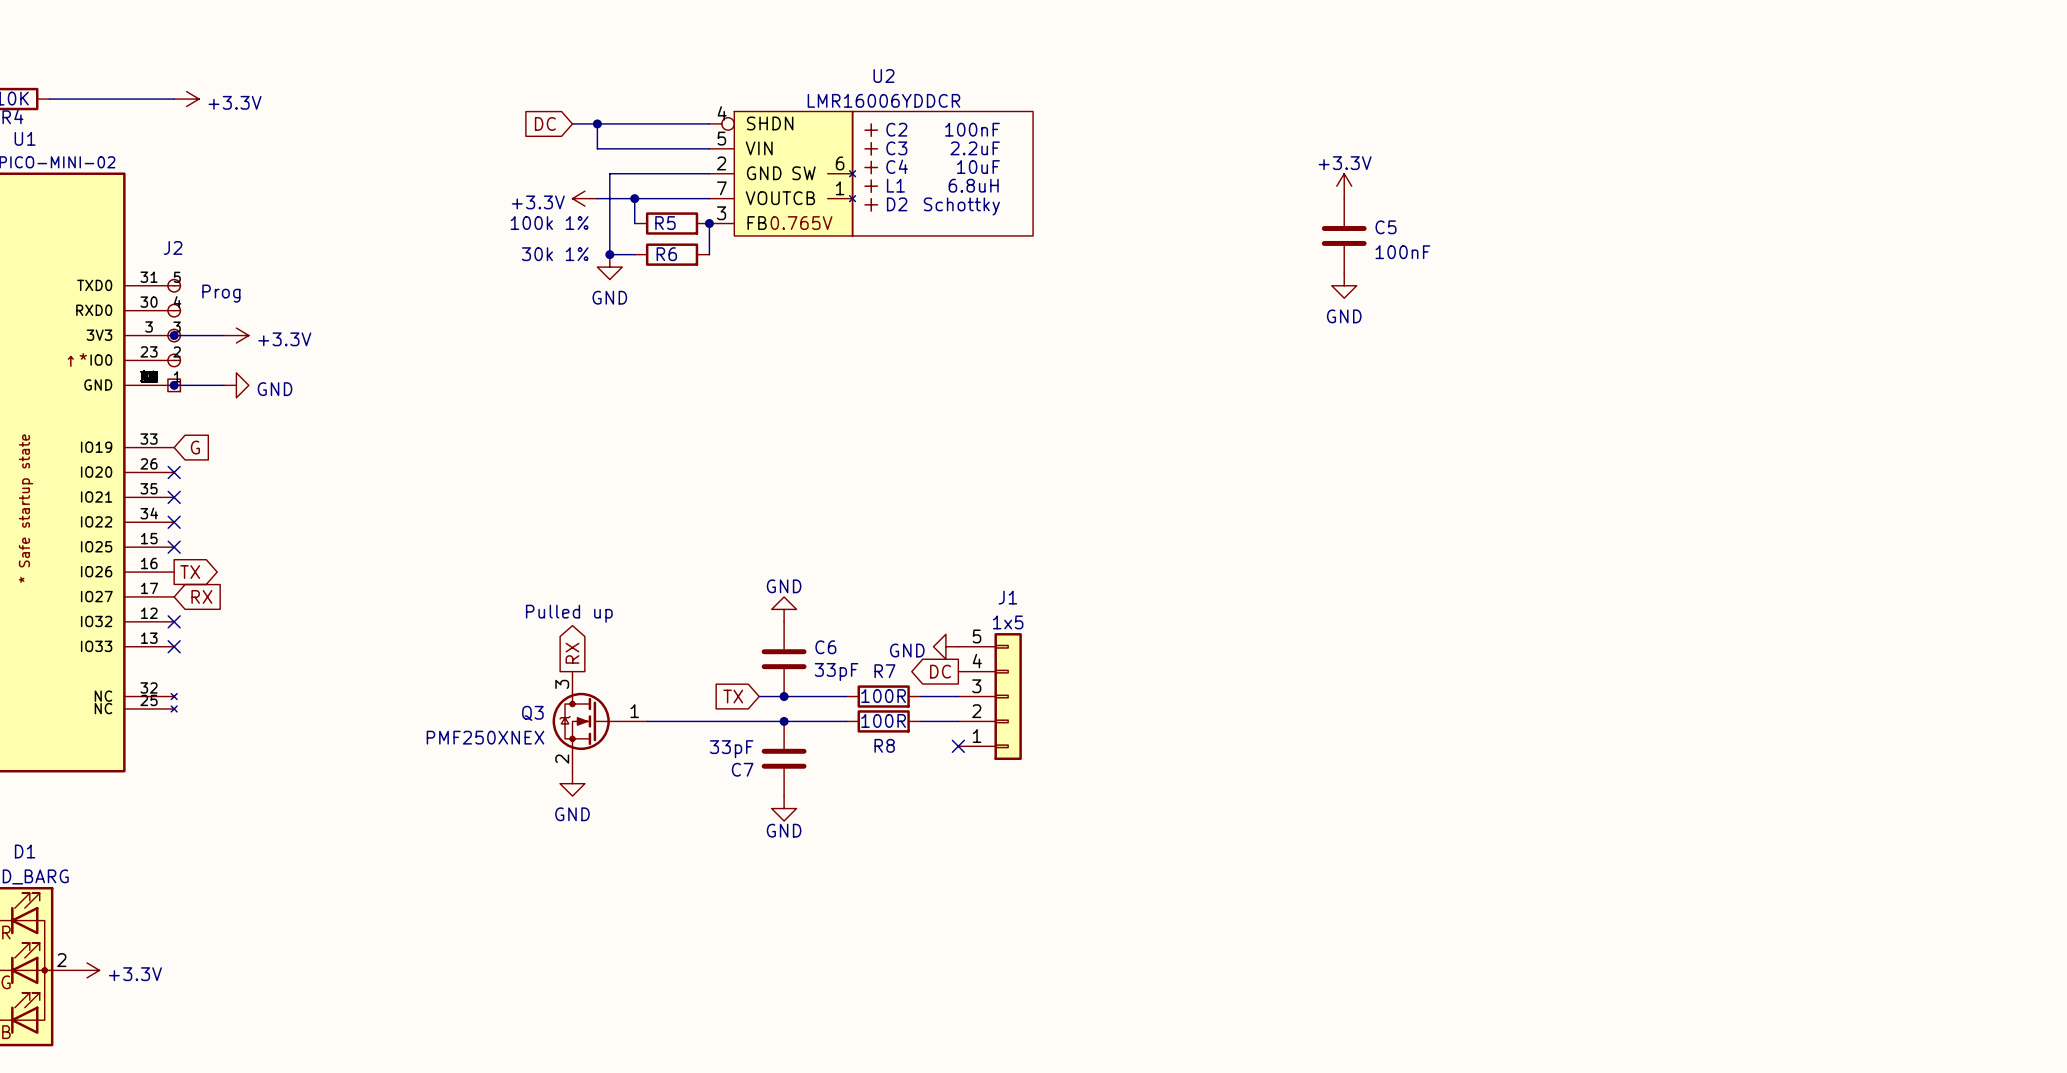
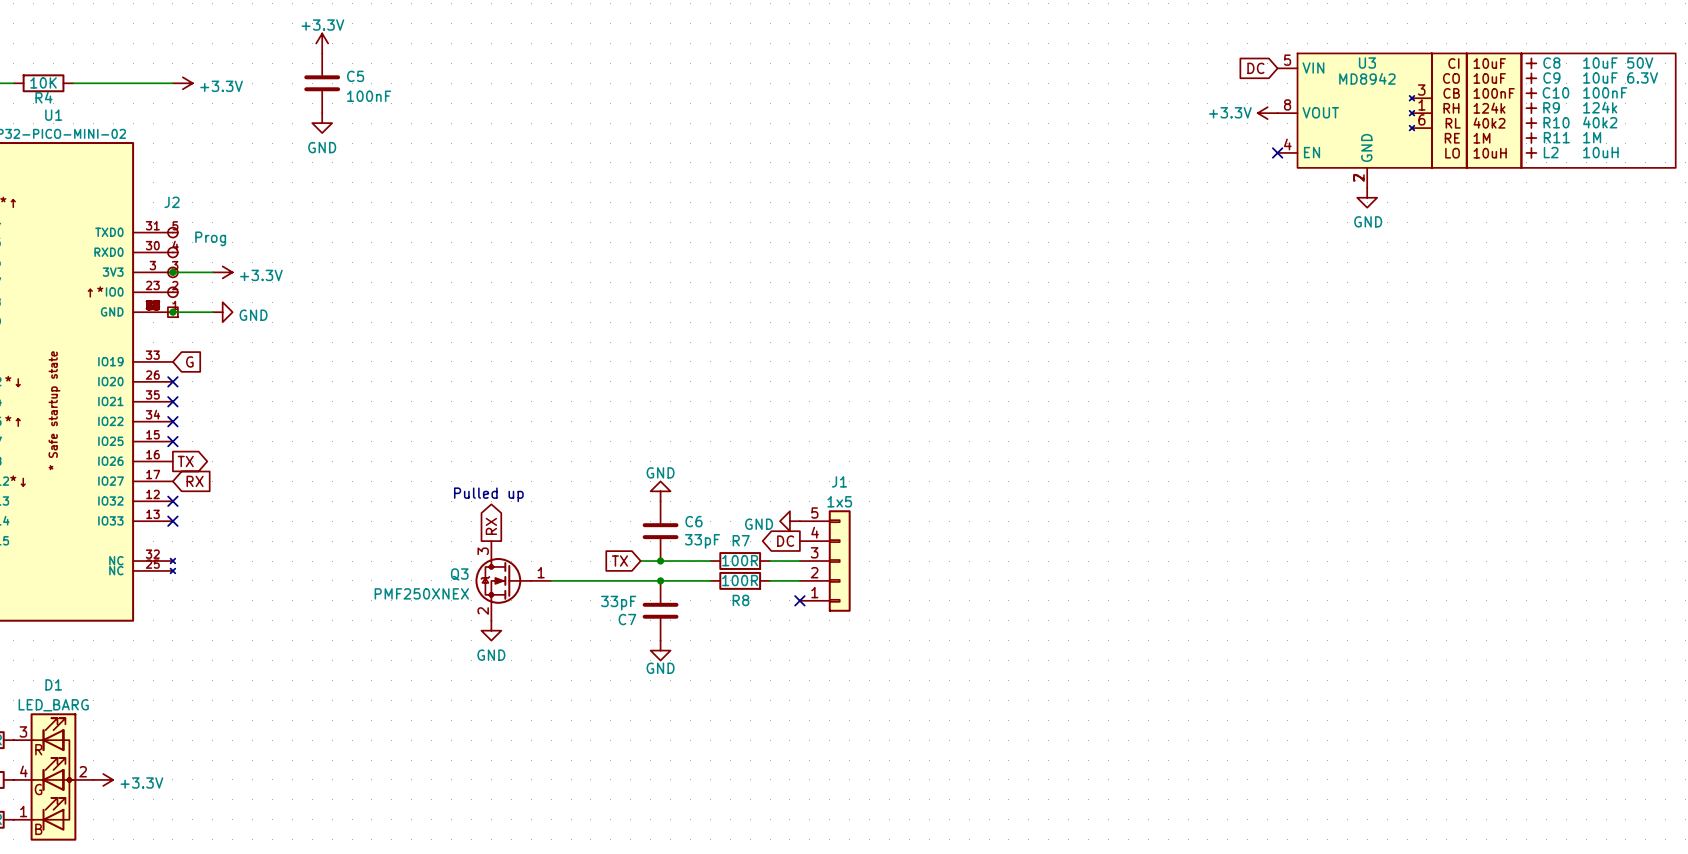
power symbol: none -> +3.3V (322, 43)
C8: none -> 10uF 50V (1531, 63)
global label: none -> DC (1255, 68)
C9: none -> 10uF 6.3V (1531, 78)
C10: none -> 100nF (1531, 93)
global label: DC (545, 123) -> none
wire: (572, 123) (709, 123) -> none
wire: (597, 123) (597, 148) (709, 148) -> none
junction: (597, 123) -> none
C2: 100nF (871, 130) -> none
R9: none -> 124k (1531, 108)
U3: none -> MD8942 (1476, 120)
power symbol: none -> GND (322, 123)
C3: 2.2uF (871, 148) -> none
R10: none -> 40k2 (1531, 123)
power symbol text position: +3.3V (1345, 163) -> +3.3V (1230, 112)
C4: 10uF (871, 167) -> none
R11: none -> 1M (1531, 138)
wire: (709, 173) (609, 173) (609, 254) (634, 254) -> none
U2: LMR16006YDDCR (871, 173) -> none
L1: 6.8uH (871, 186) -> none
power symbol rotation: 0° (1344, 186) -> 90° counterclockwise (1267, 113)
power symbol position: +3.3V (1344, 186) -> +3.3V (1267, 113)
no-connect mark: none -> (1277, 152)
L2: none -> 10uH (1531, 152)
power symbol: +3.3V (584, 198) -> none
wire: (597, 198) (709, 198) -> none
wire: (634, 198) (634, 223) -> none
junction: (634, 198) -> none
D2: Schottky (871, 204) -> none
R5: 100k 1% (672, 223) -> none
wire: (709, 223) (709, 254) -> none
junction: (709, 223) -> none
C5 position: (1344, 235) -> (322, 83)
power symbol: none -> GND (1367, 197)
junction: (609, 254) -> none
R6: 30k 1% (672, 254) -> none
power symbol: GND (609, 267) -> none
power symbol: GND (1344, 285) -> none

